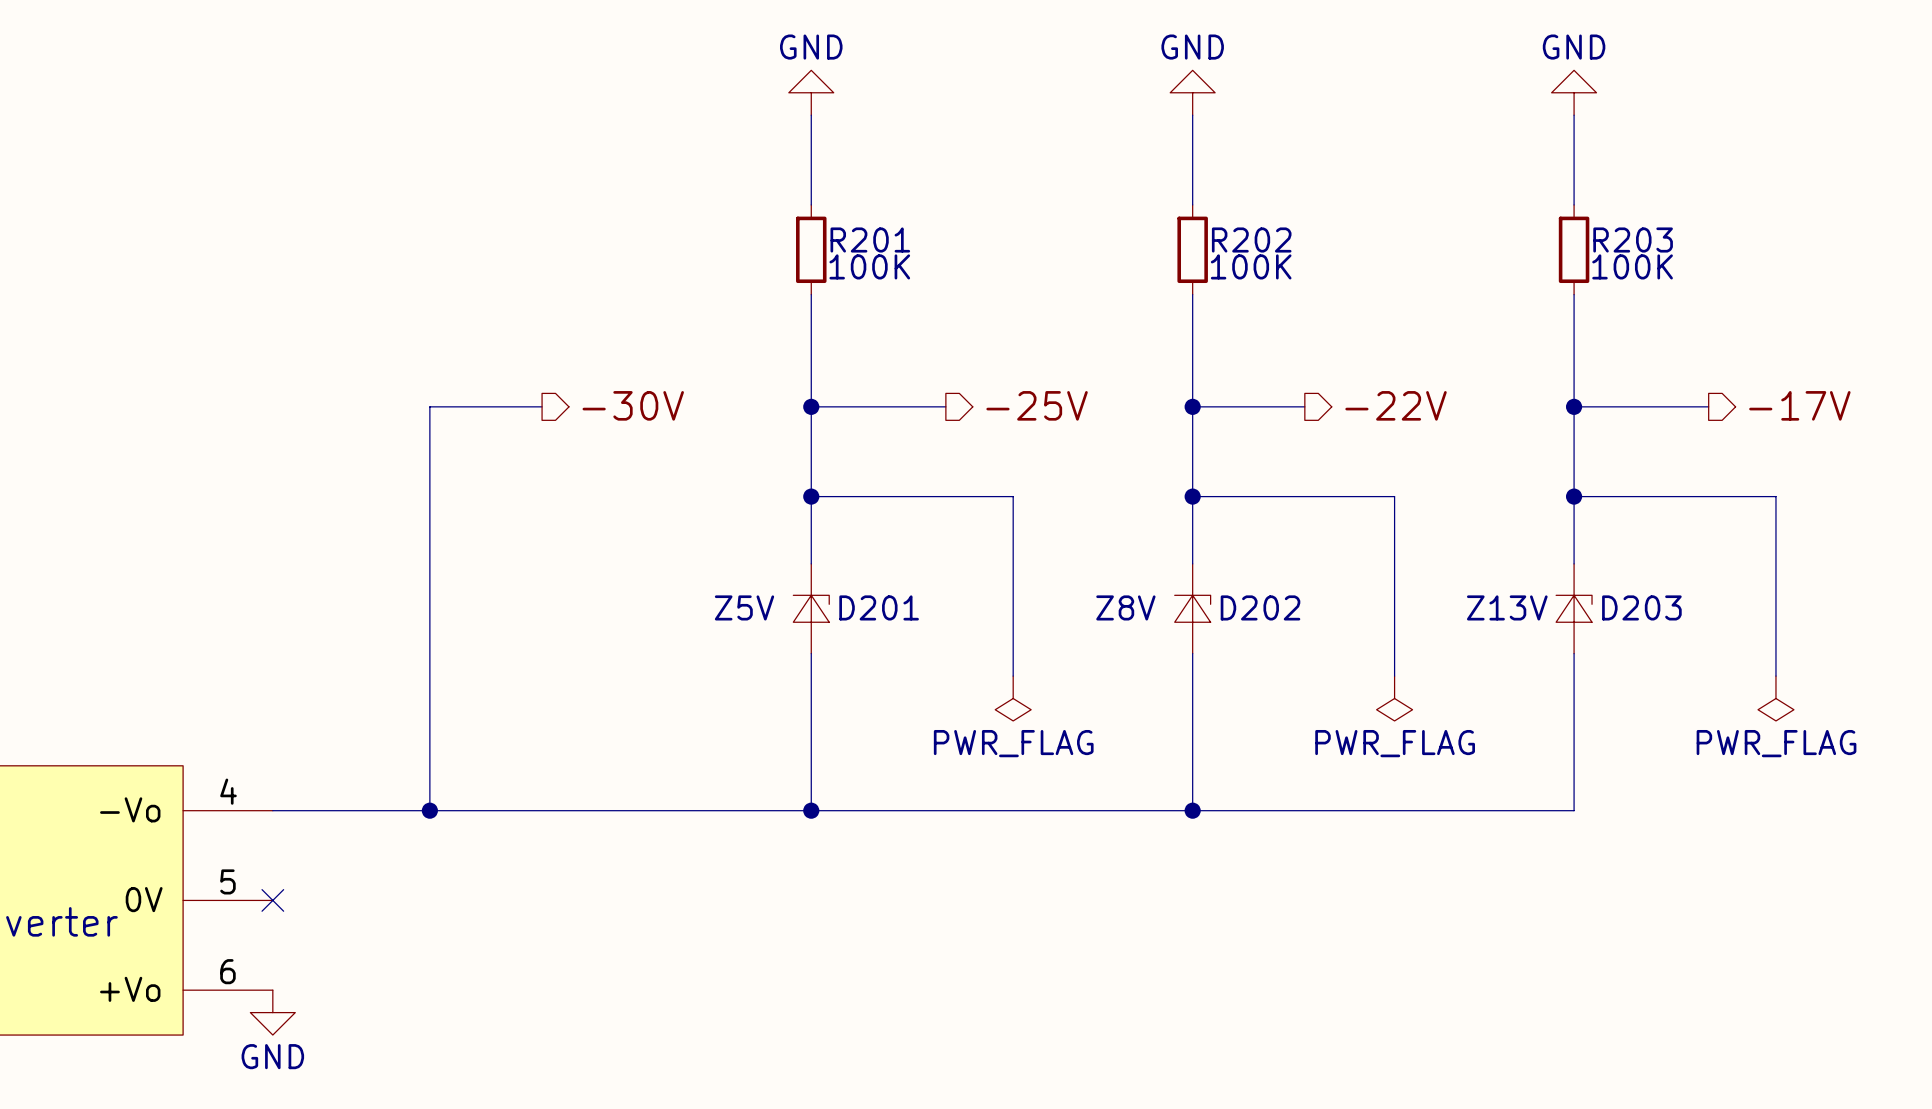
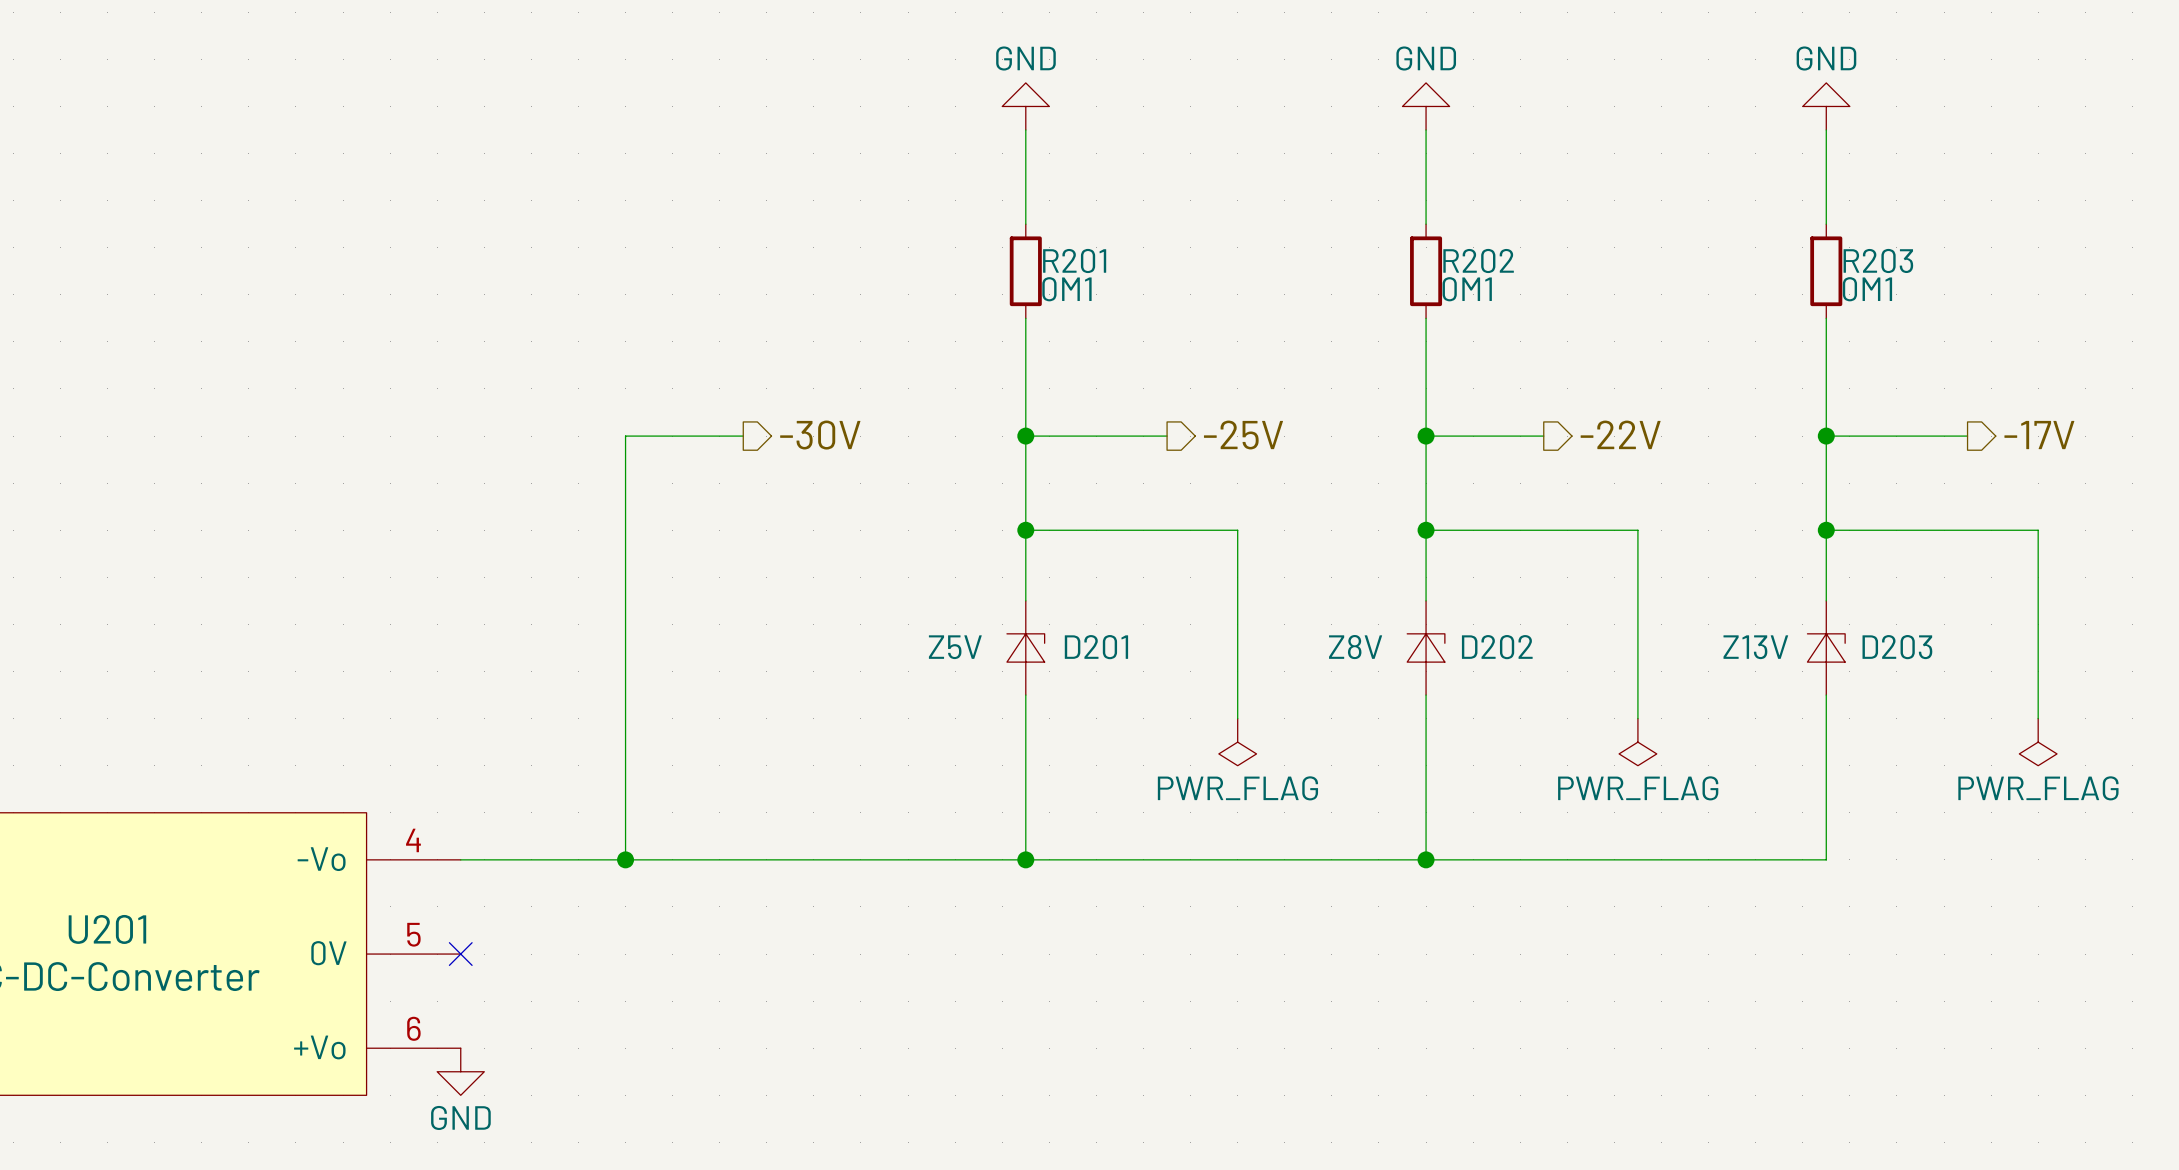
R201 value: 100K (869, 266) -> 0M1 (1066, 289)
R202 value: 100K (1251, 266) -> 0M1 (1467, 289)
R203 value: 100K (1632, 266) -> 0M1 (1867, 289)

